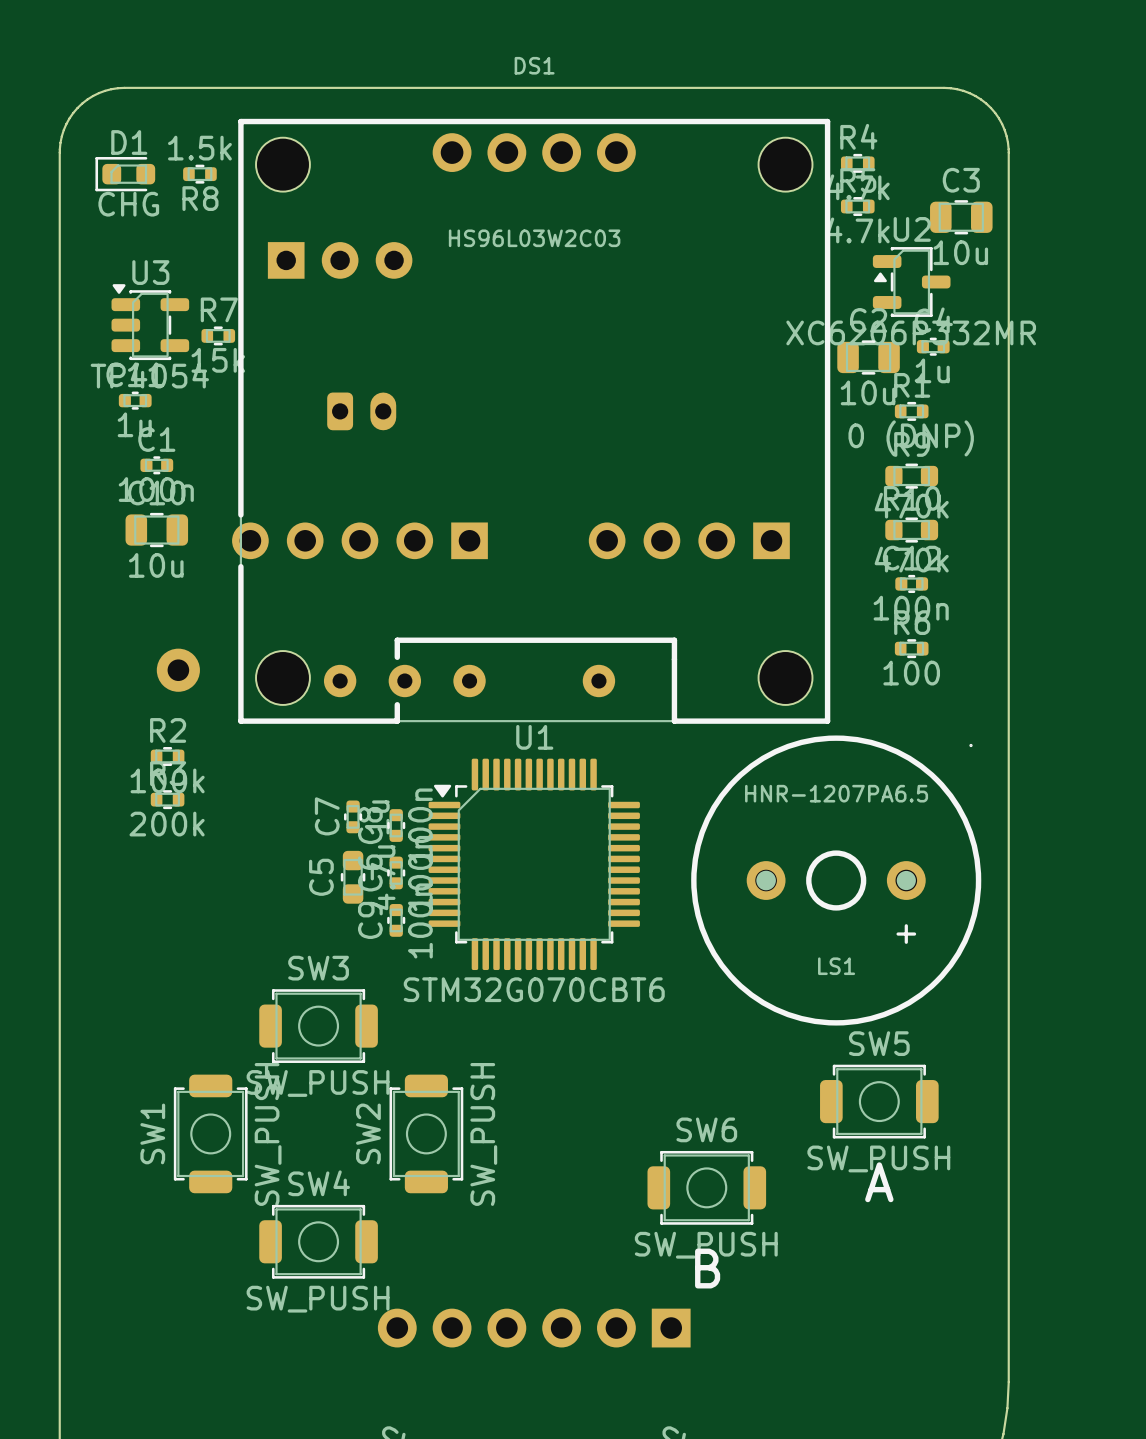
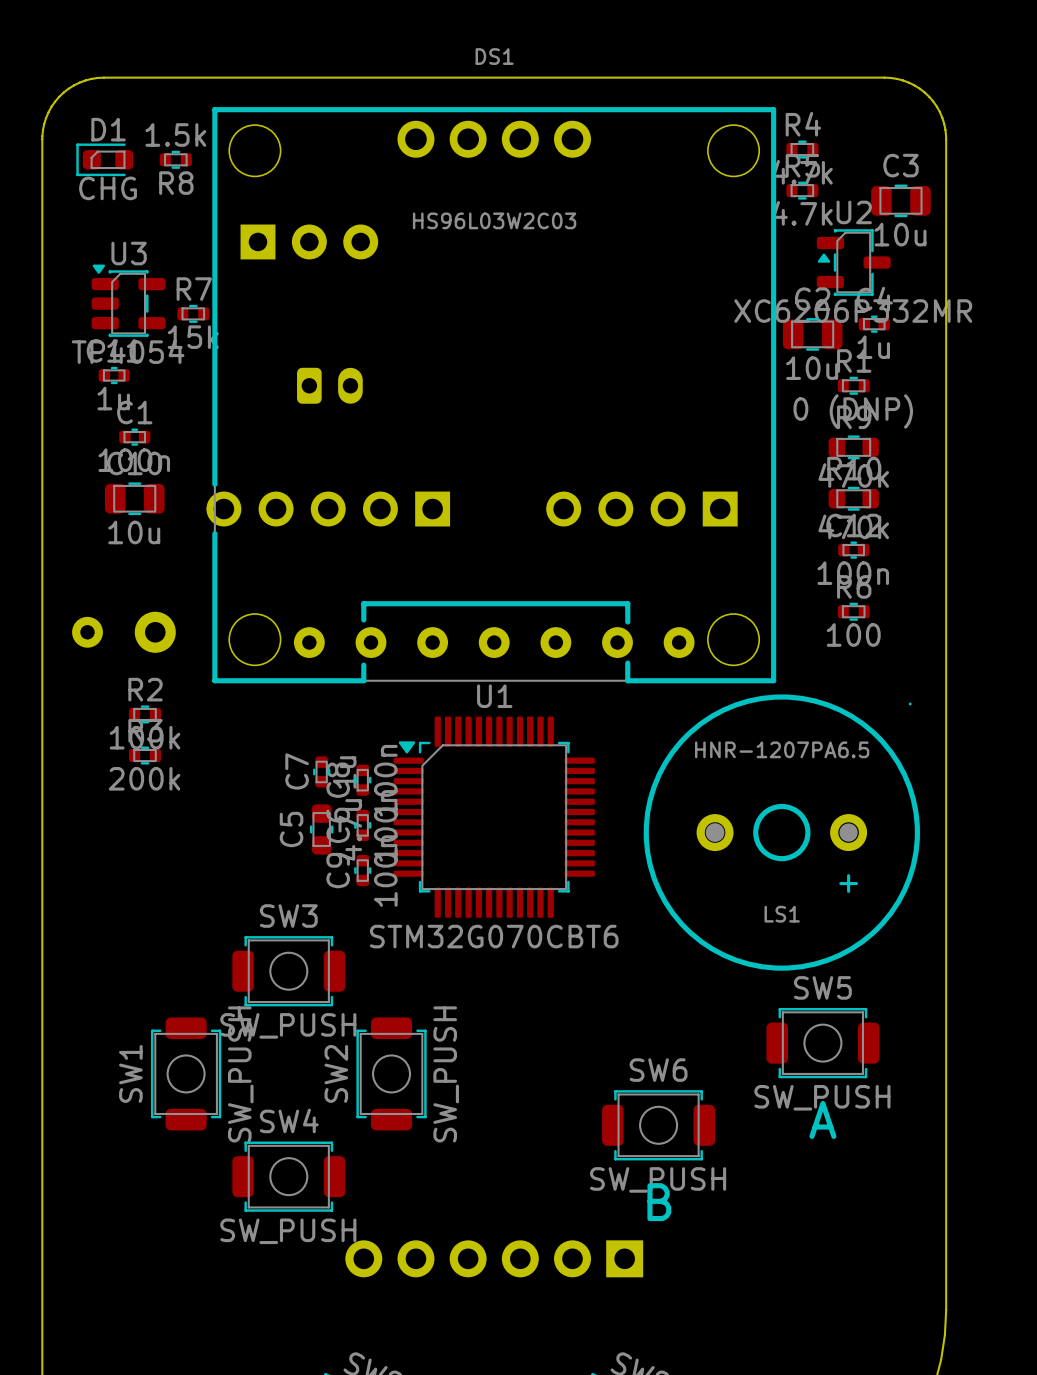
DS1 footprint: [238, 118, 831, 724] -> [212, 107, 777, 684]
part: none -> (87, 632)
part: none -> (494, 642)
part: none -> (617, 642)
part: none -> (679, 642)

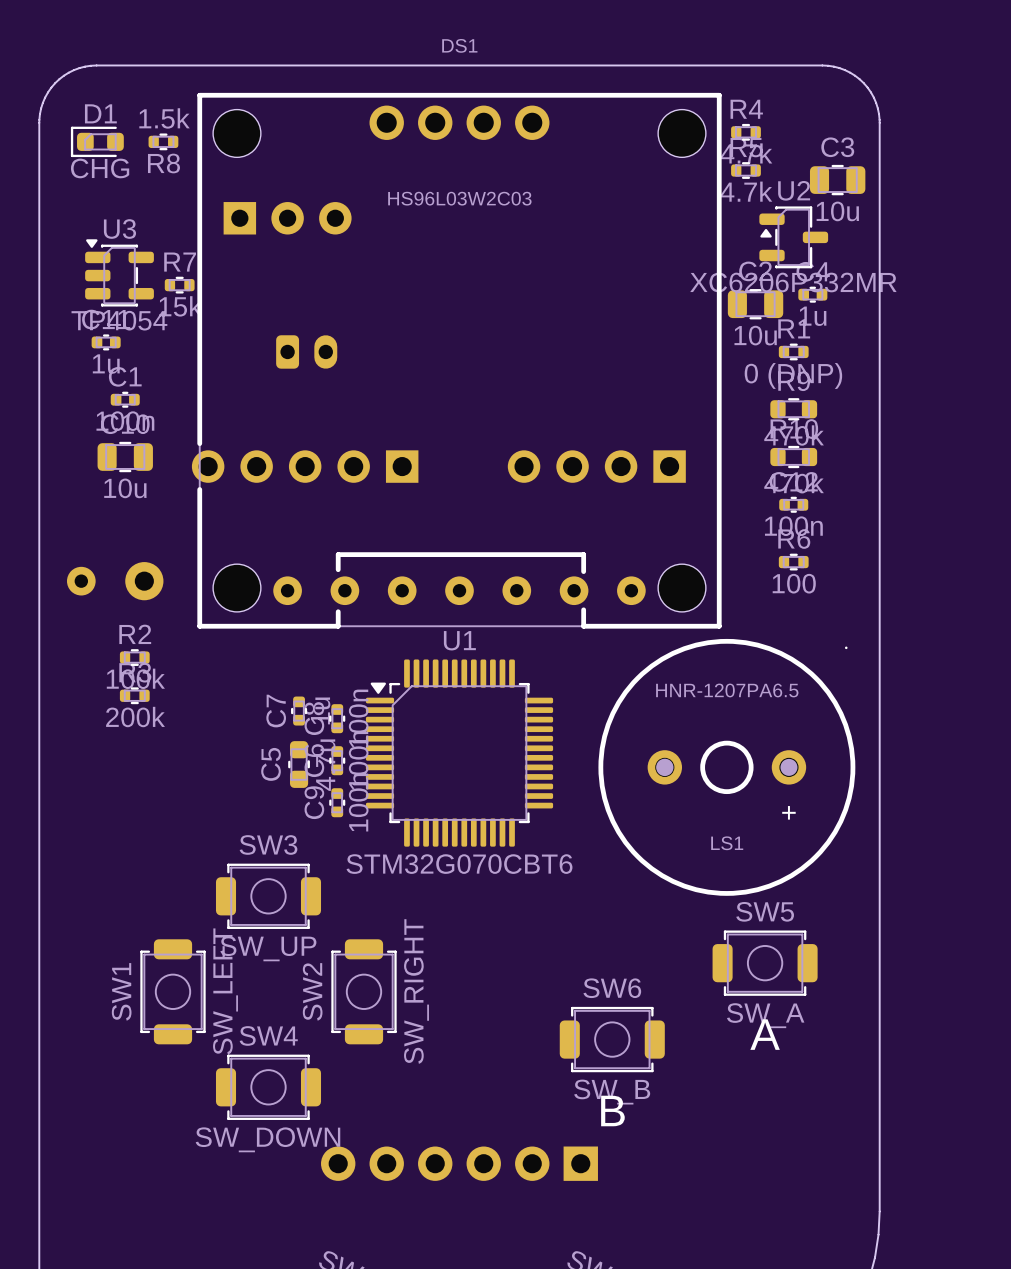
SW3 value: SW_PUSH (288, 1025) -> SW_UP (268, 948)
SW1 value: SW_PUSH (240, 1074) -> SW_LEFT (225, 991)
SW2 value: SW_PUSH (446, 1074) -> SW_RIGHT (416, 991)
SW5 value: SW_PUSH (822, 1097) -> SW_A (765, 1015)
SW6 value: SW_PUSH (658, 1179) -> SW_B (612, 1092)
SW4 value: SW_PUSH (288, 1231) -> SW_DOWN (267, 1139)

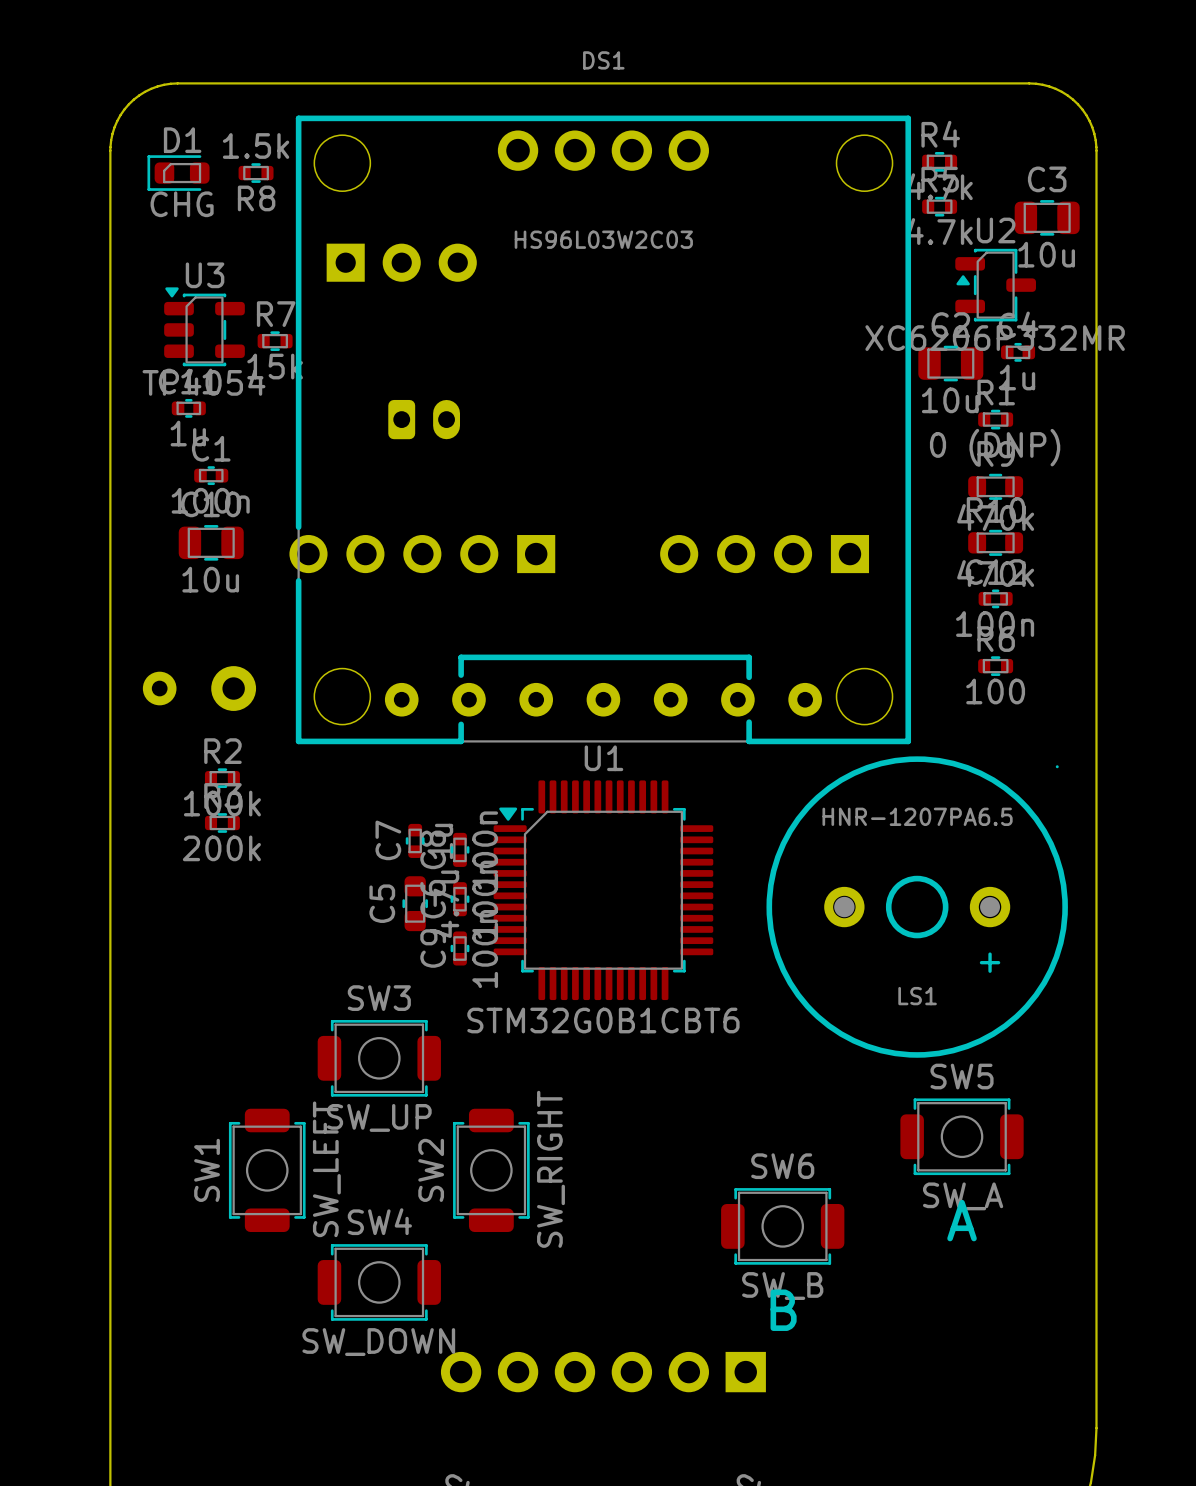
U1 value: STM32G070CBT6 (459, 864) -> STM32G0B1CBT6 (603, 1020)

